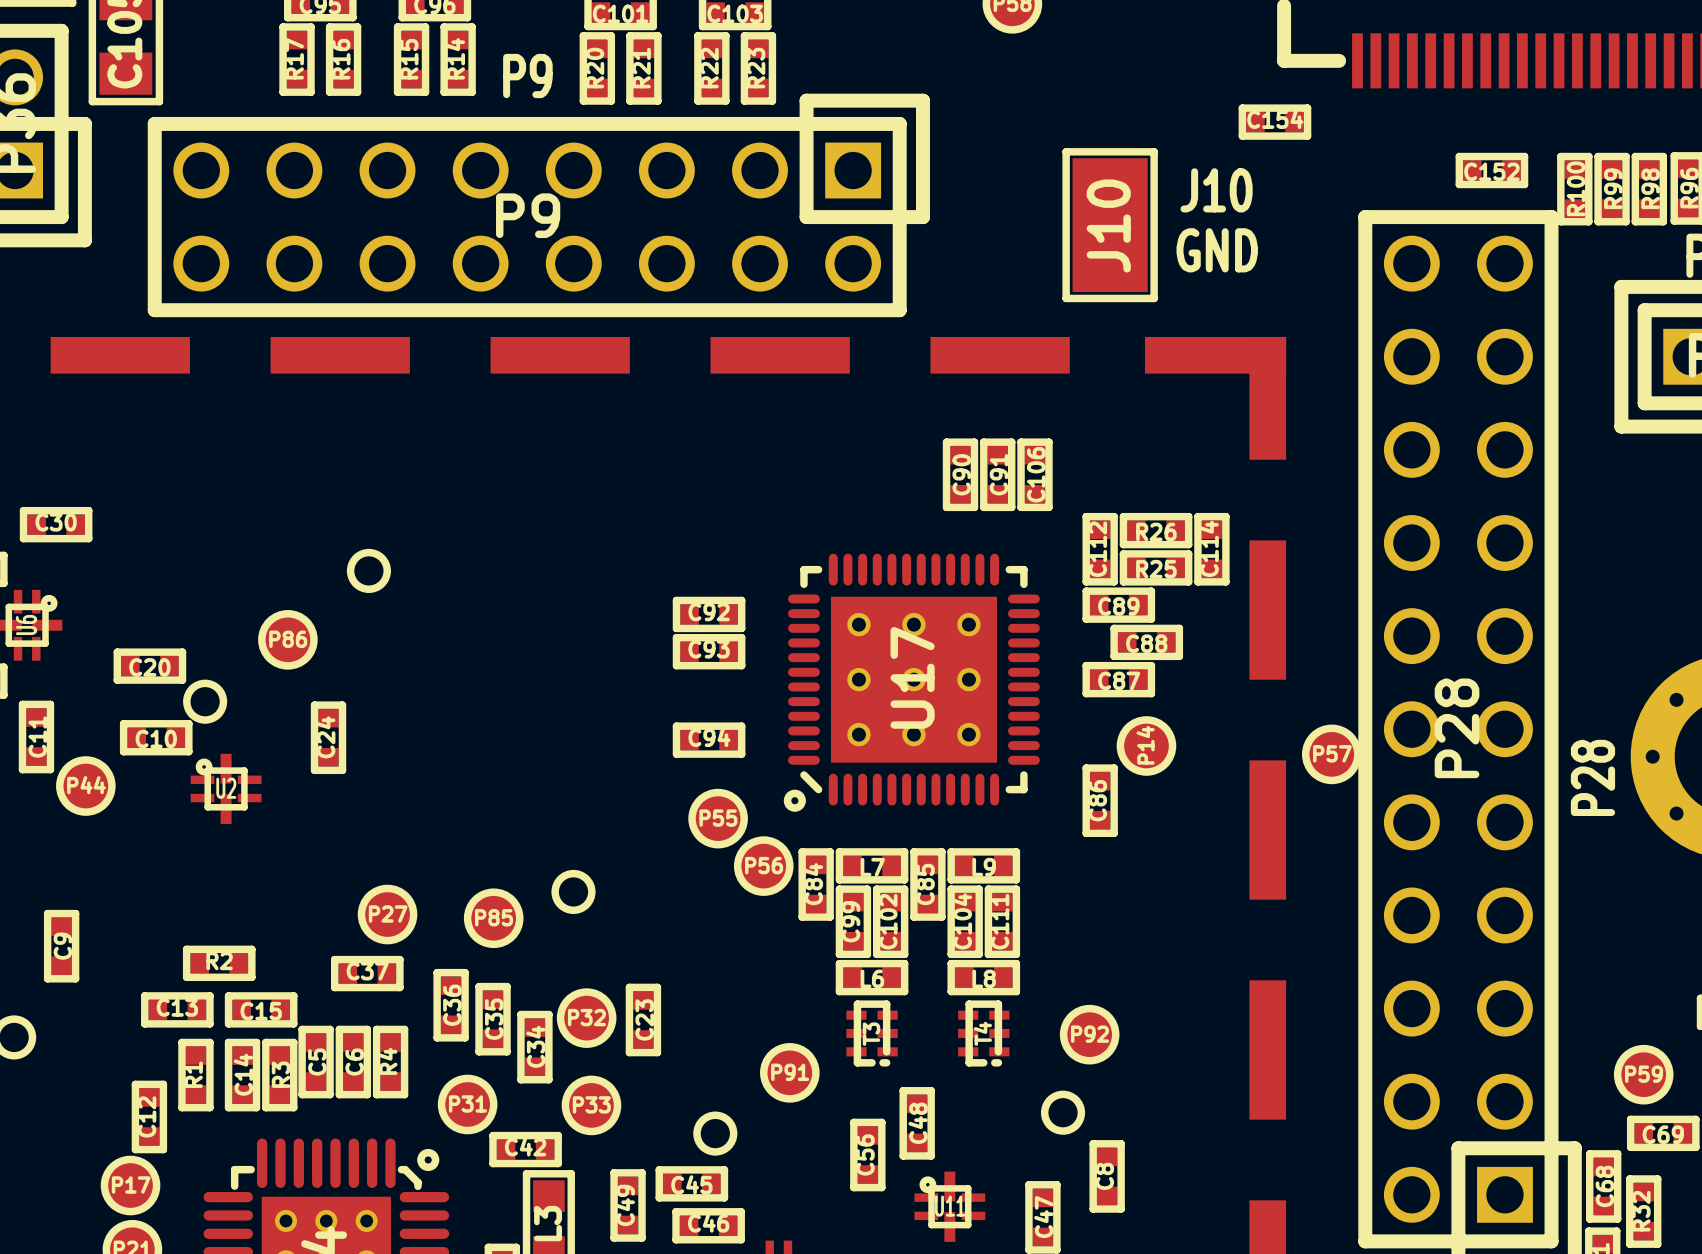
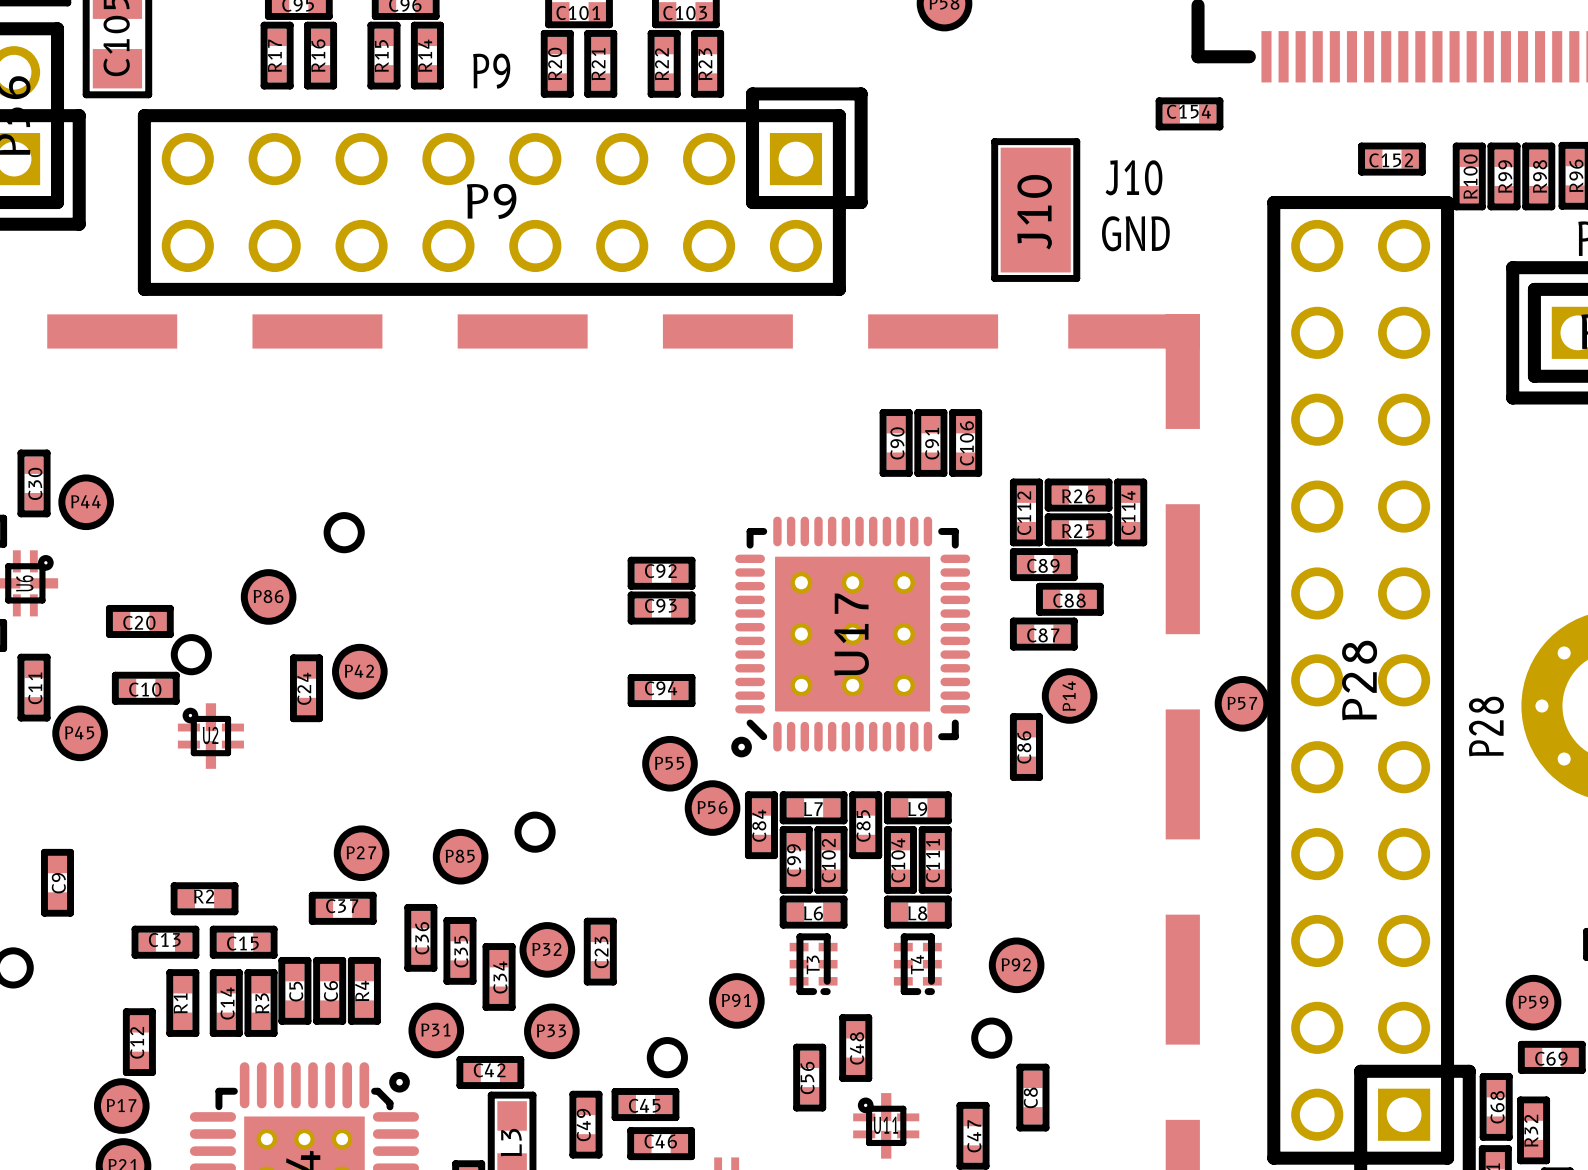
C30 rotation: 0° (56, 524) -> 90° clockwise (34, 483)
P44: none -> (86, 502)
P42: none -> (359, 671)
P44 name: P44 (86, 785) -> P45 (79, 732)

